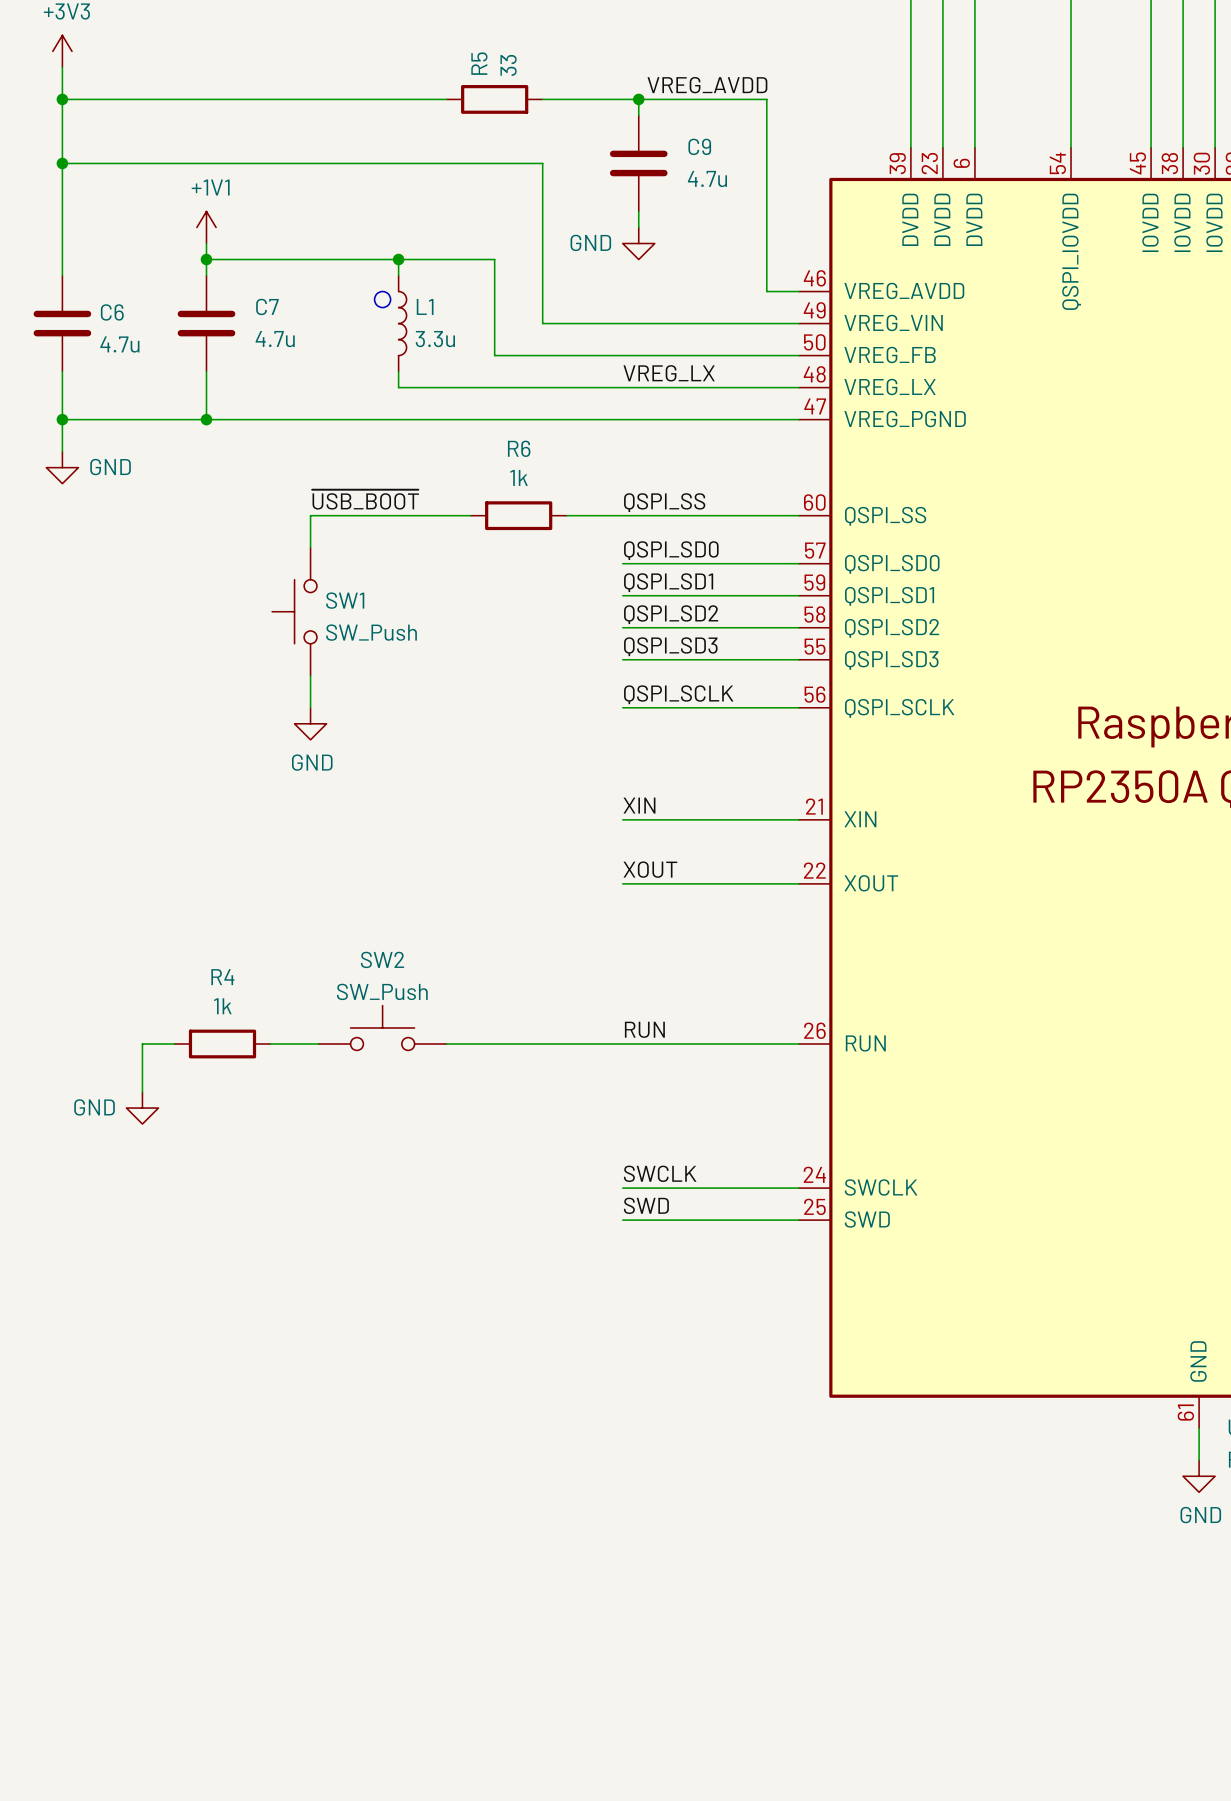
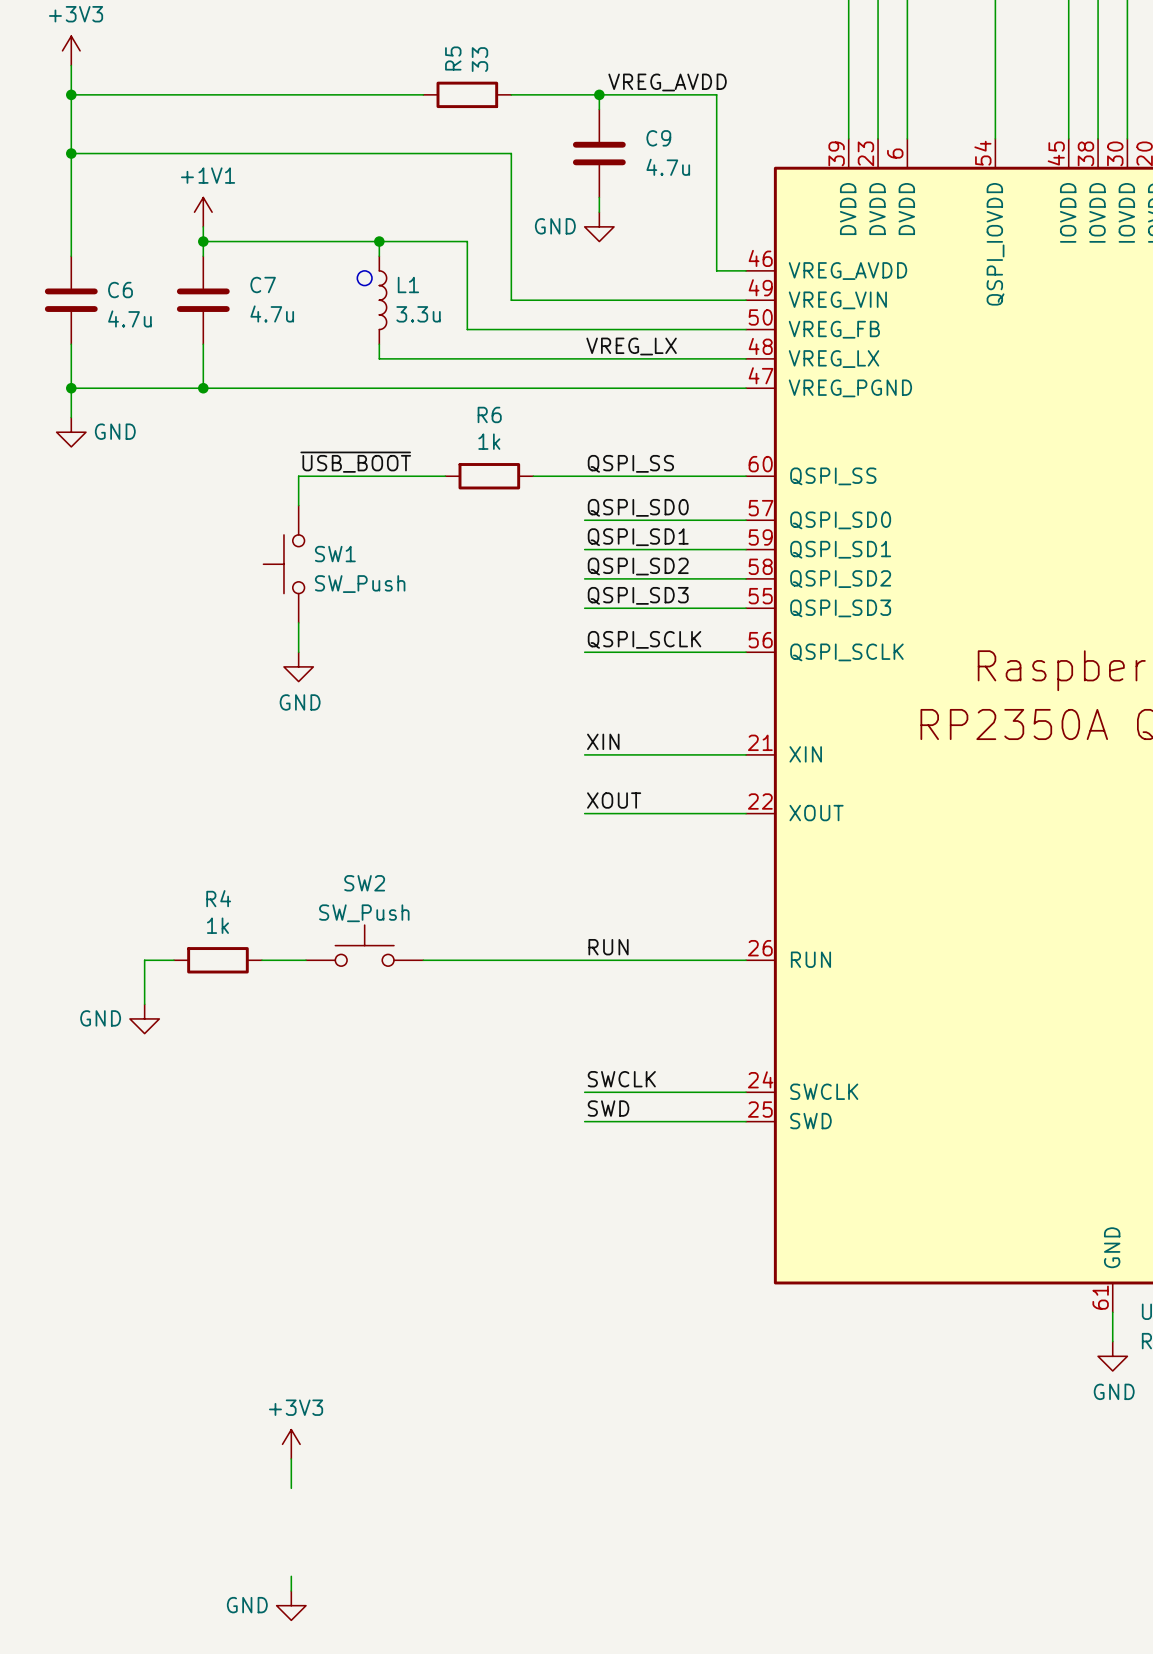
power symbol: none -> +3V3 (291, 1444)
wire: none -> (291, 1458) (291, 1488)
wire: none -> (291, 1576) (291, 1591)
power symbol: none -> GND (291, 1605)

